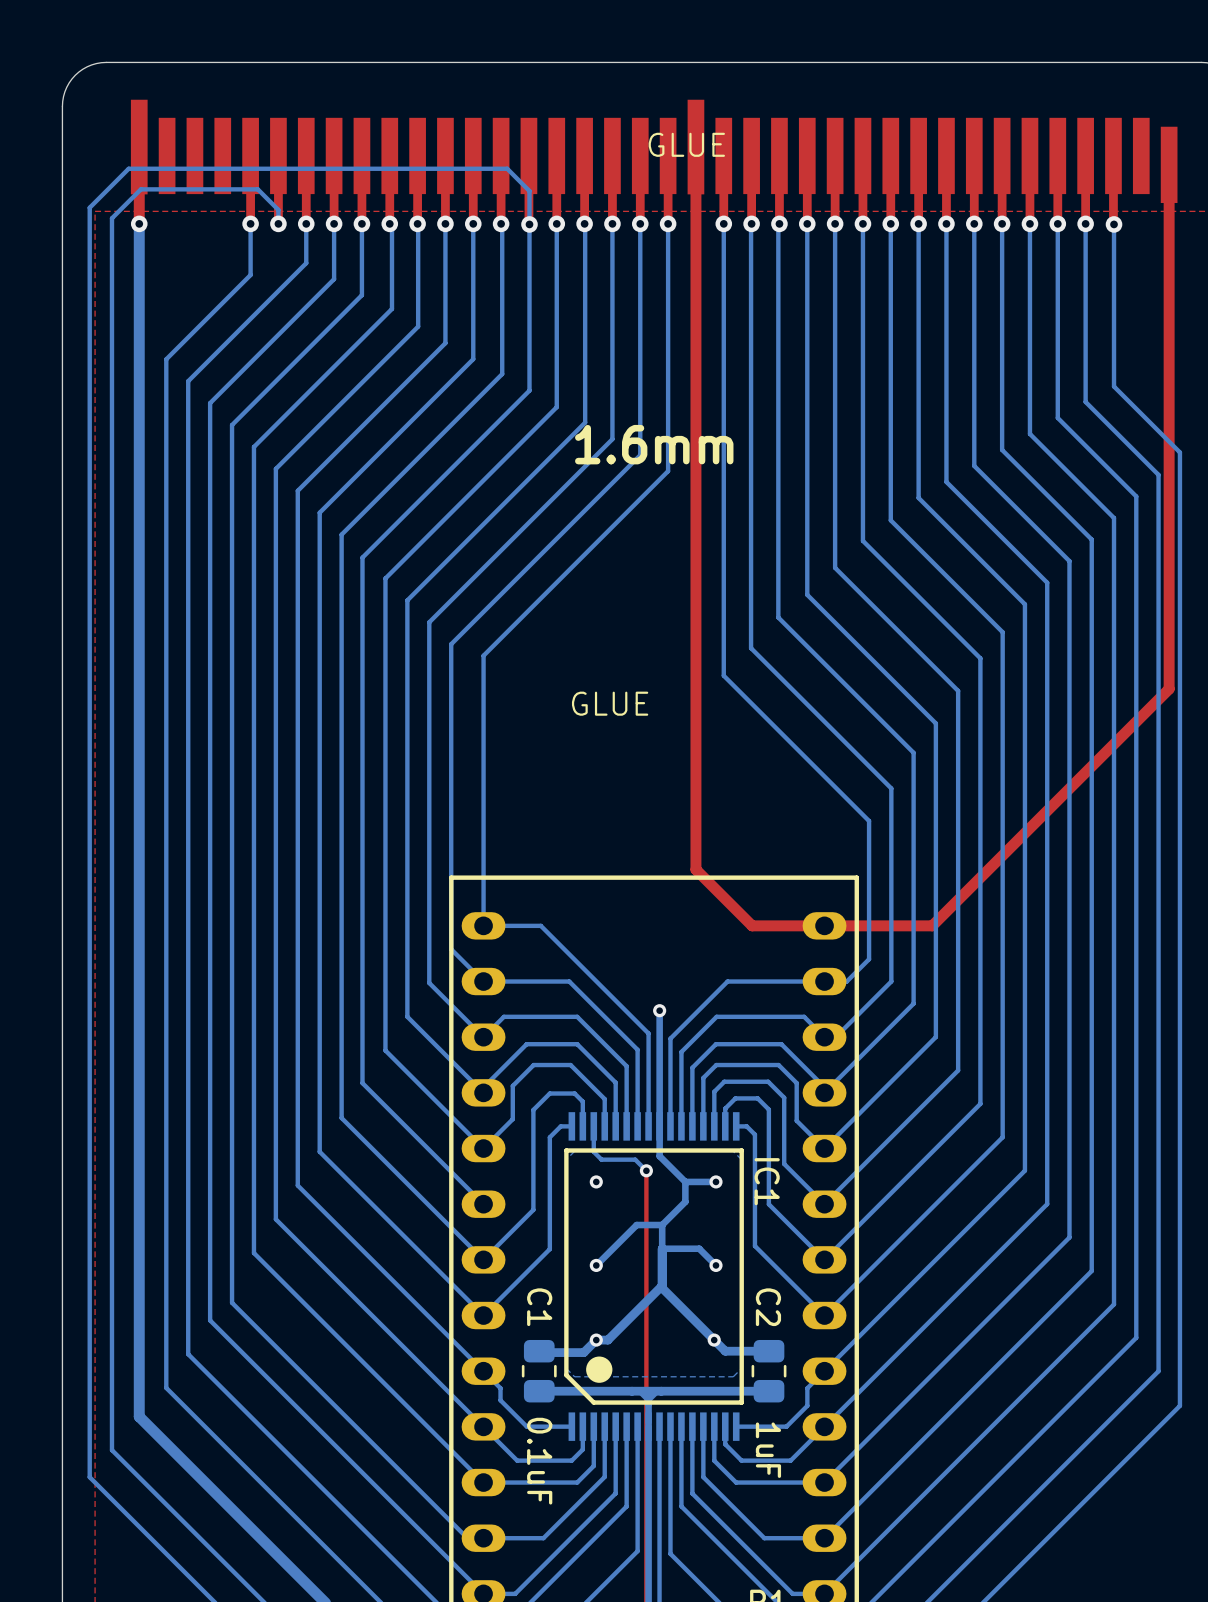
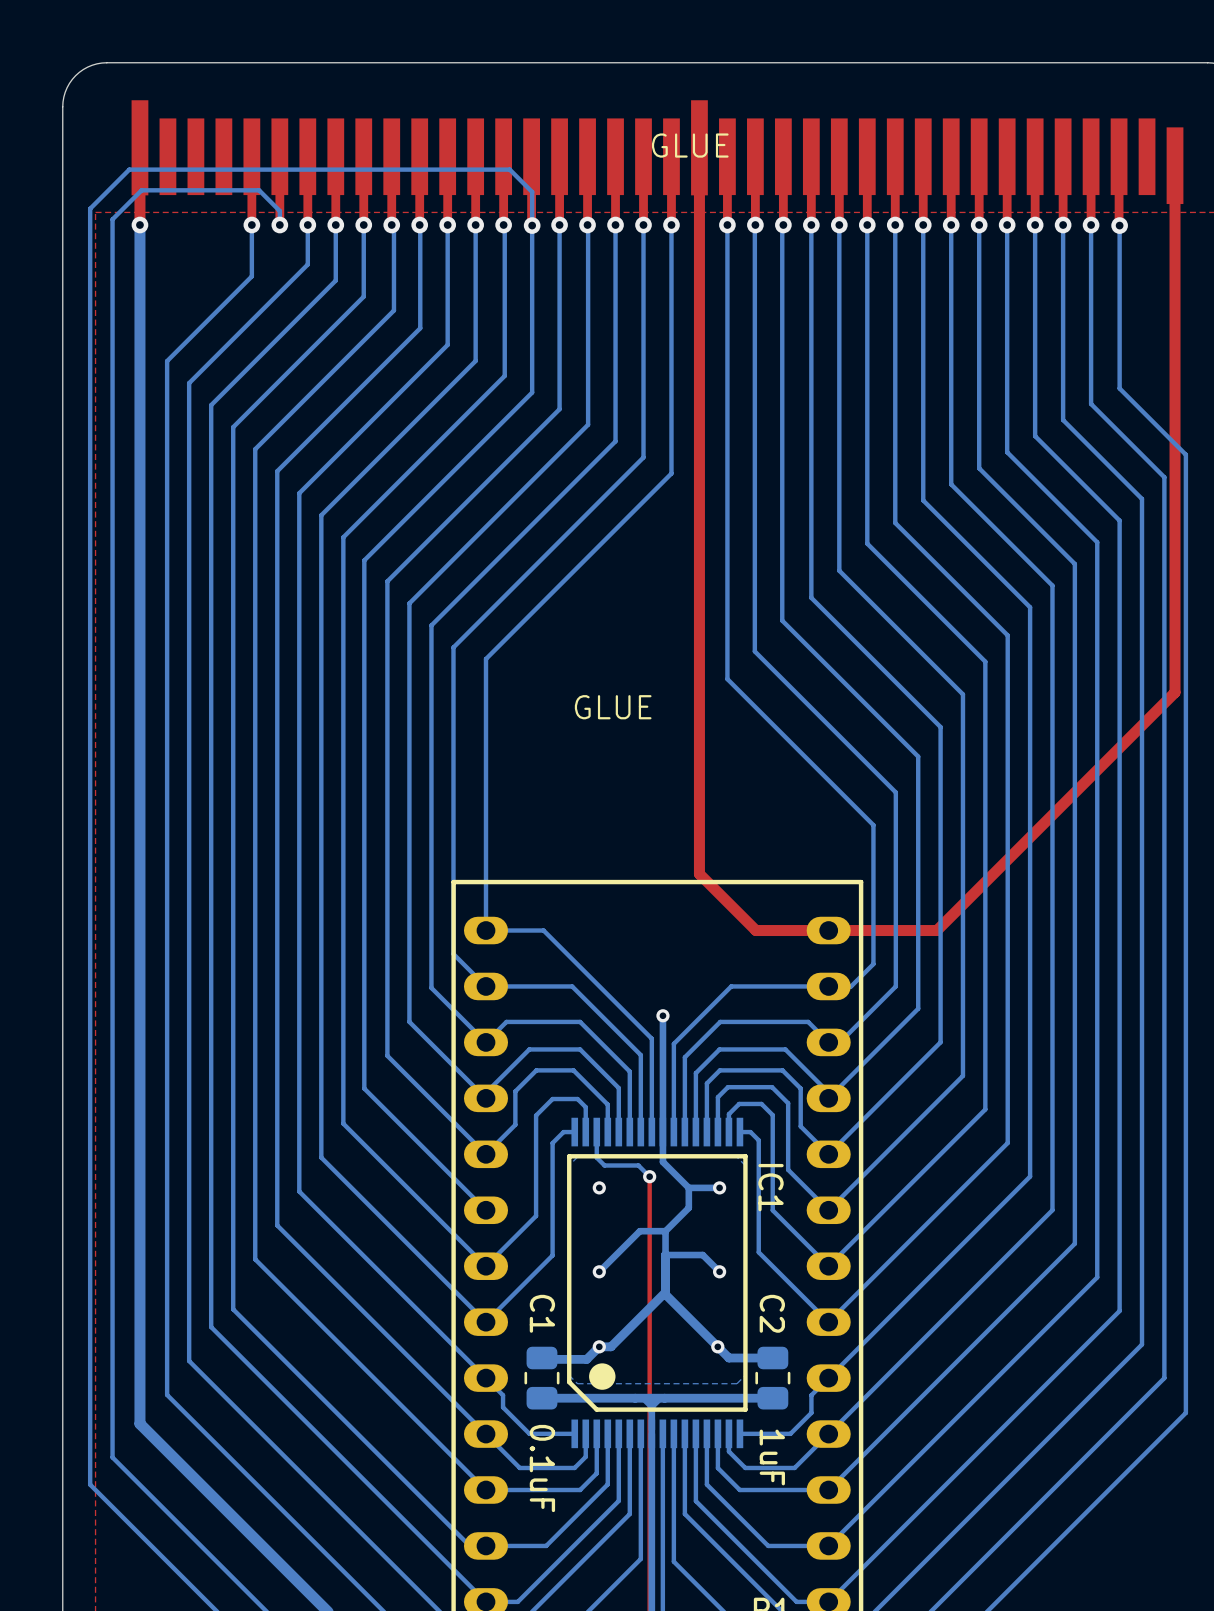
text: 1.6mm (654, 444) -> none

